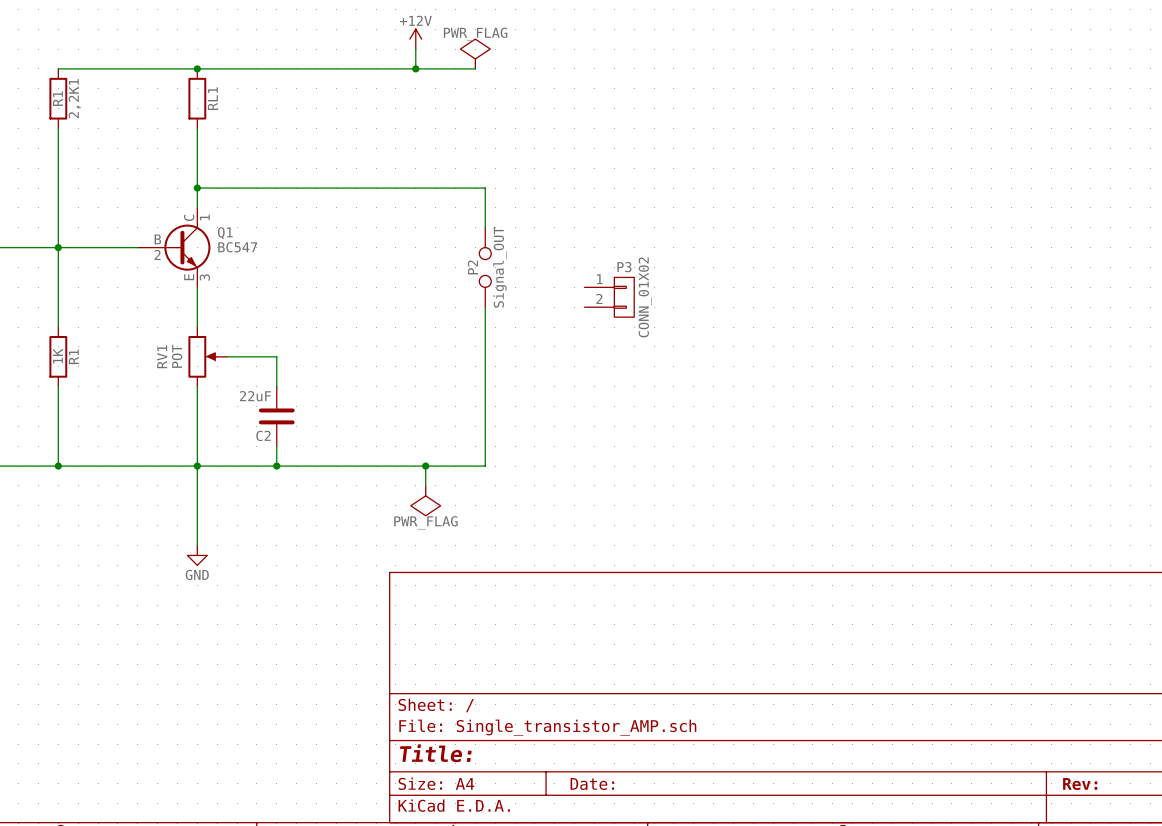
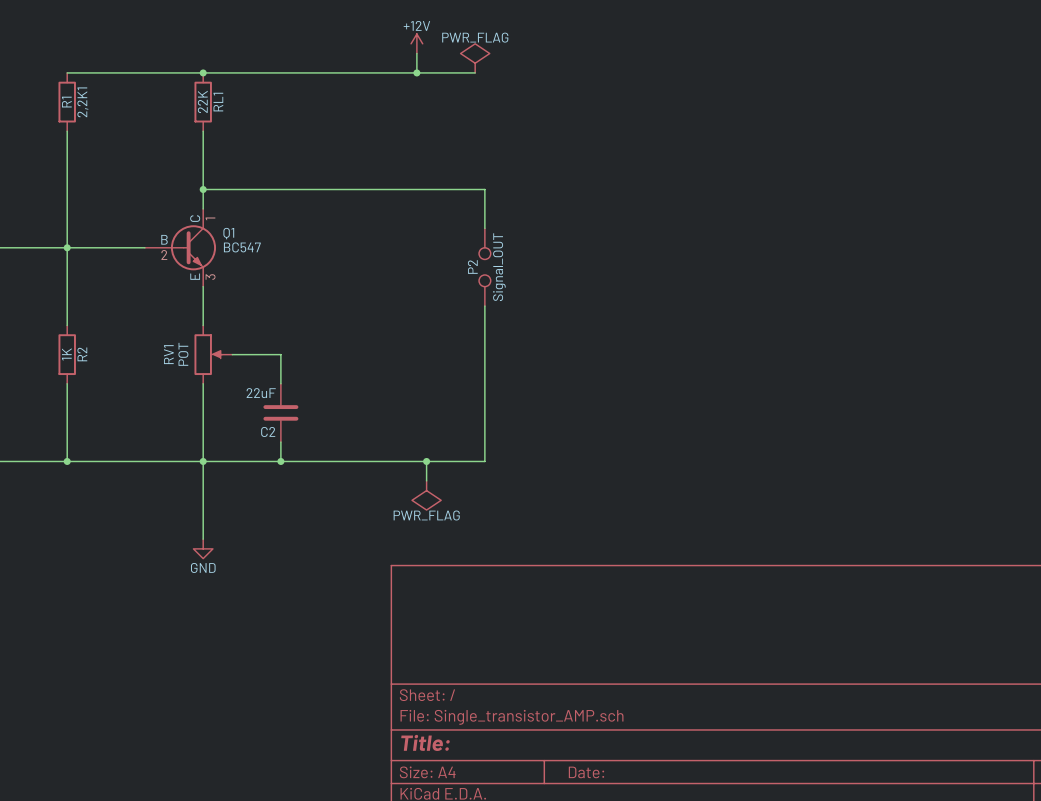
RL1 value: none -> 22K (202, 101)
P3: CONN_01X02 (609, 297) -> none
R1 name: R1 (73, 356) -> R2 (82, 354)

